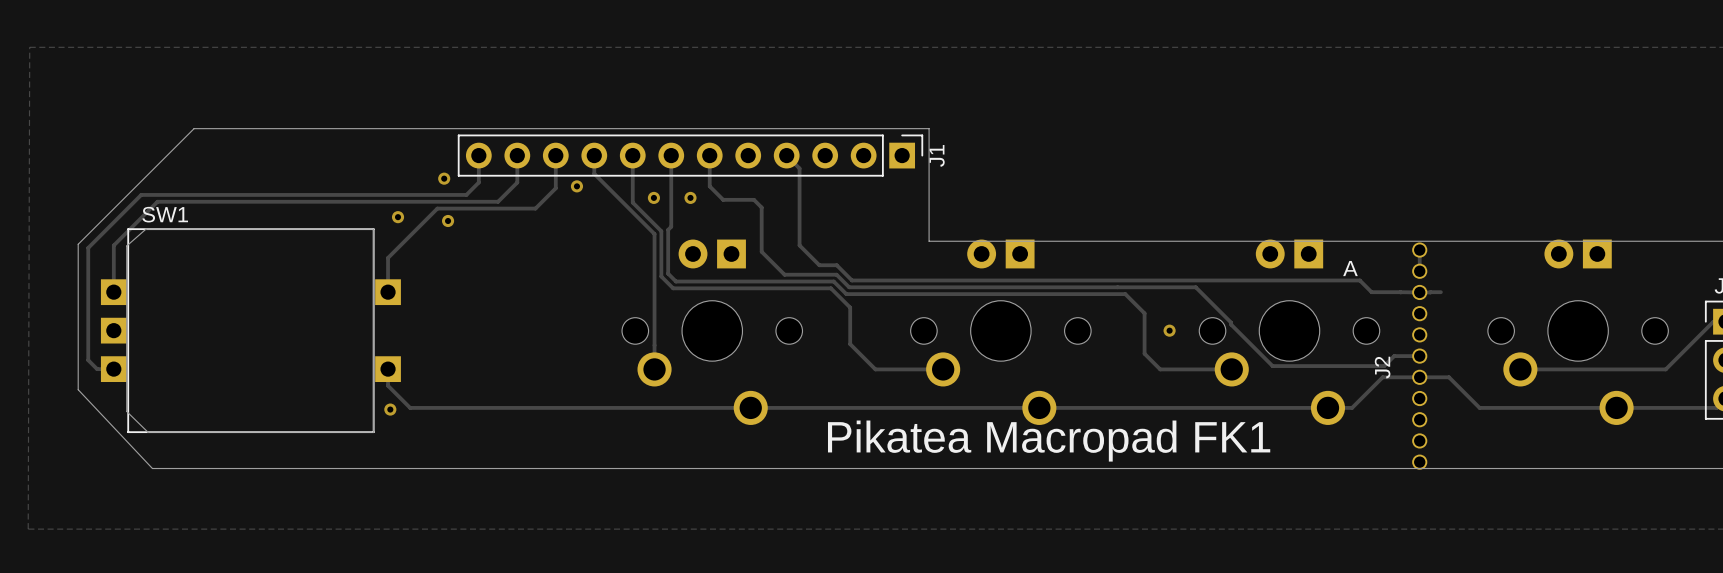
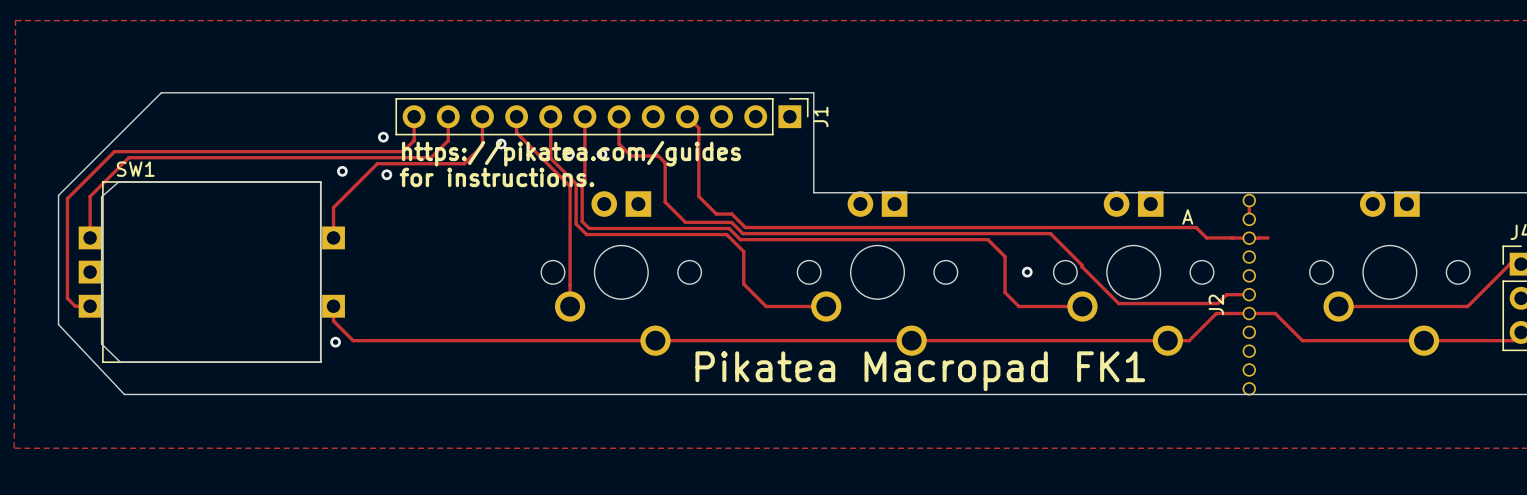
text: none -> https://pikatea.com/guides (571, 153)
text: none -> for instructions. (496, 177)

